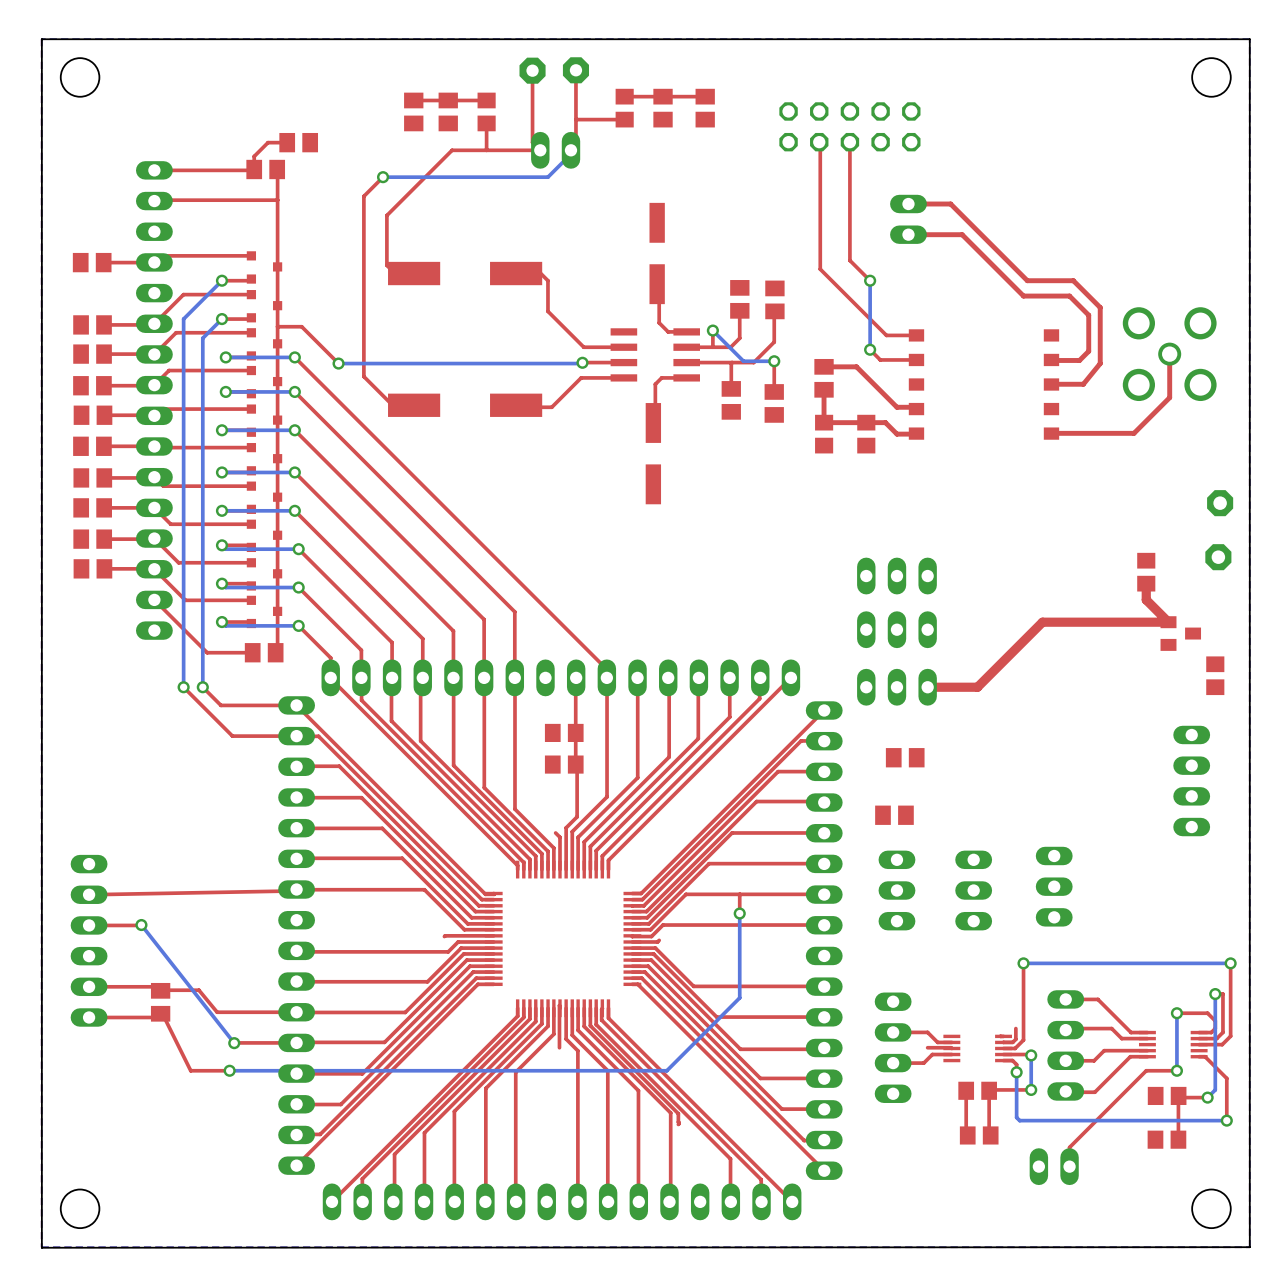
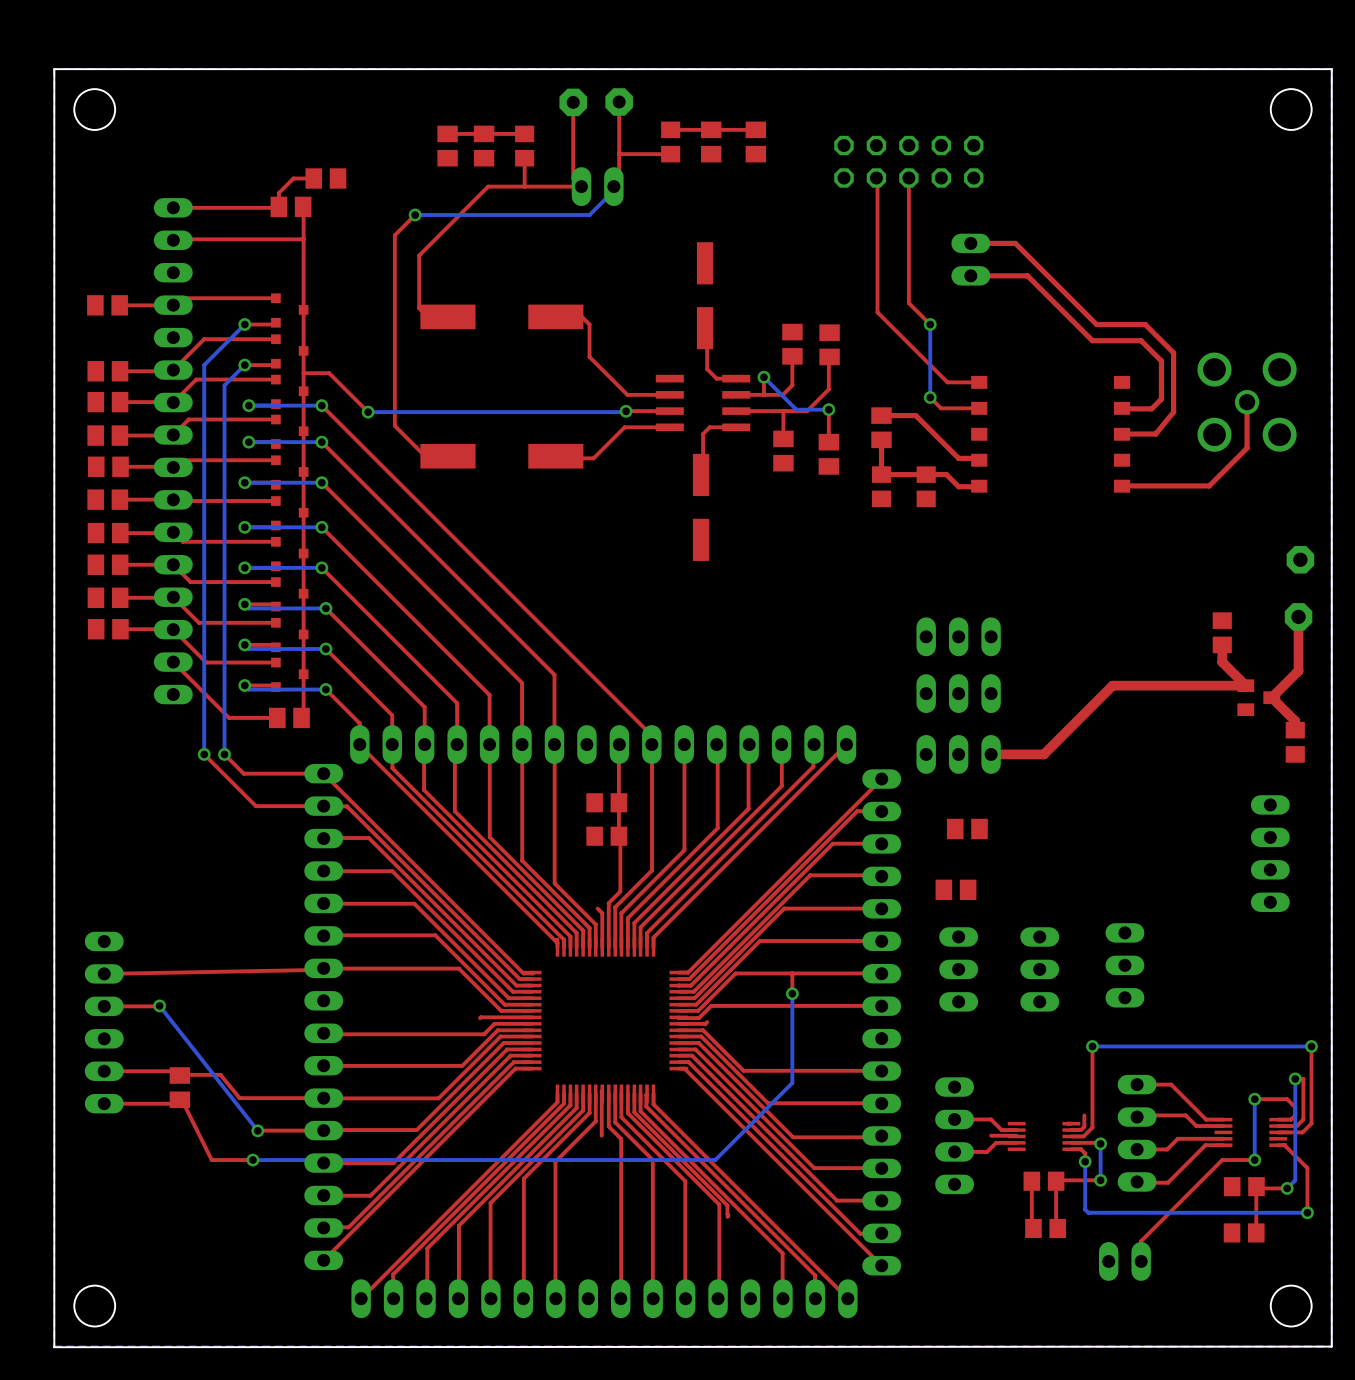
top track: none -> (1298, 616) (1298, 670) (1271, 697) (1295, 721) (1295, 730)

